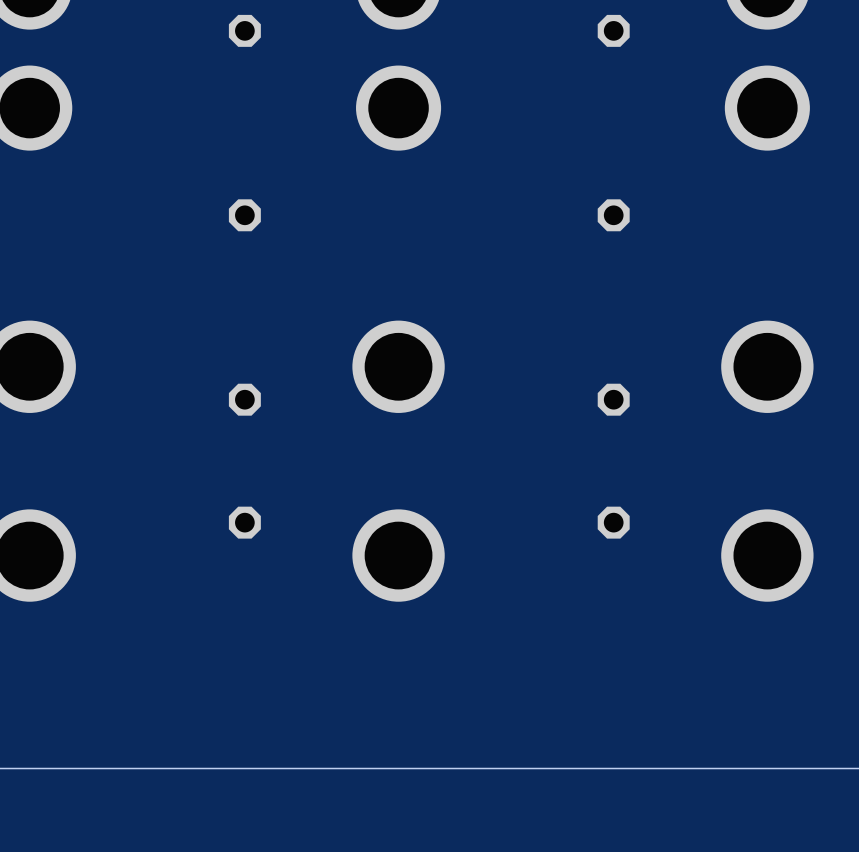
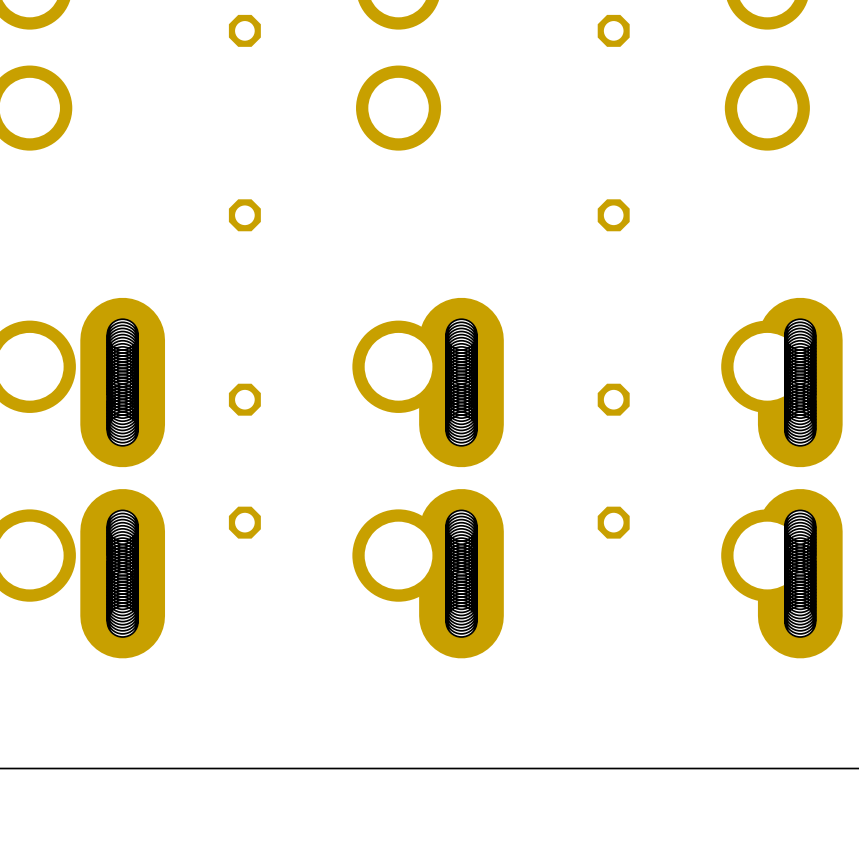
part: none -> (122, 478)
part: none -> (461, 478)
part: none -> (800, 478)

